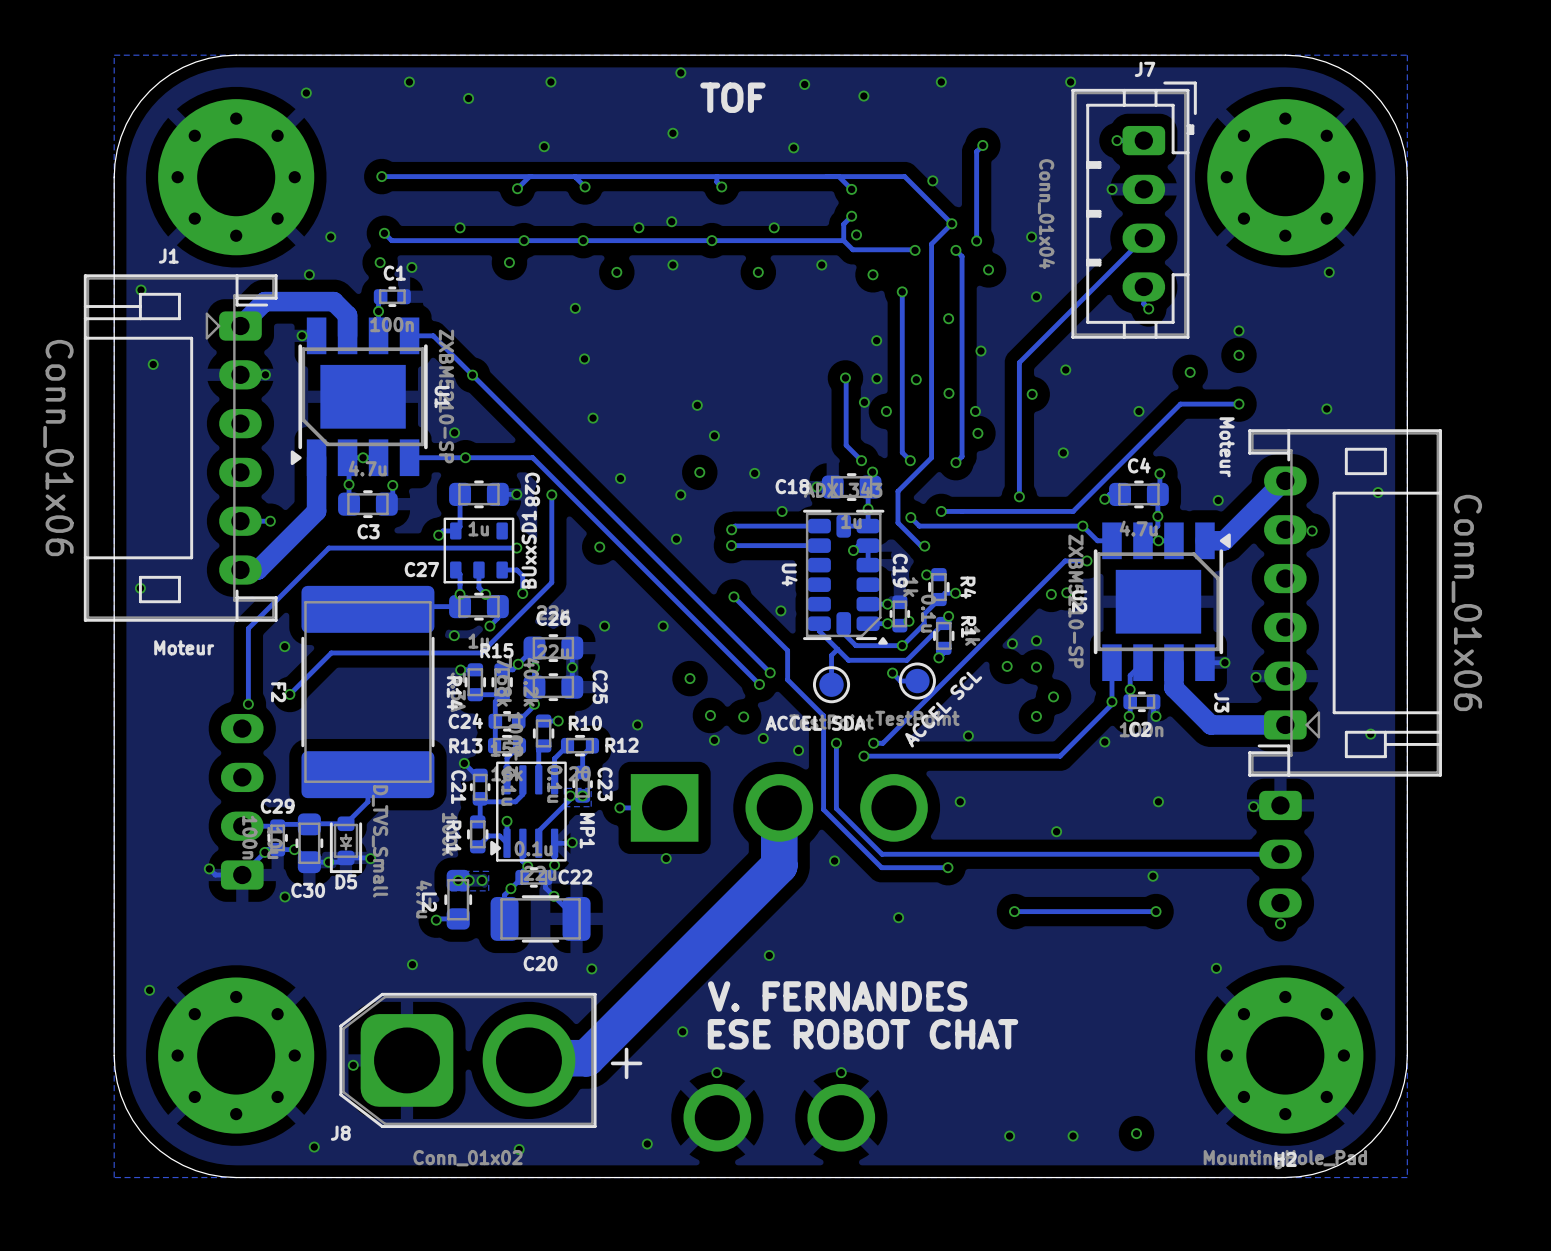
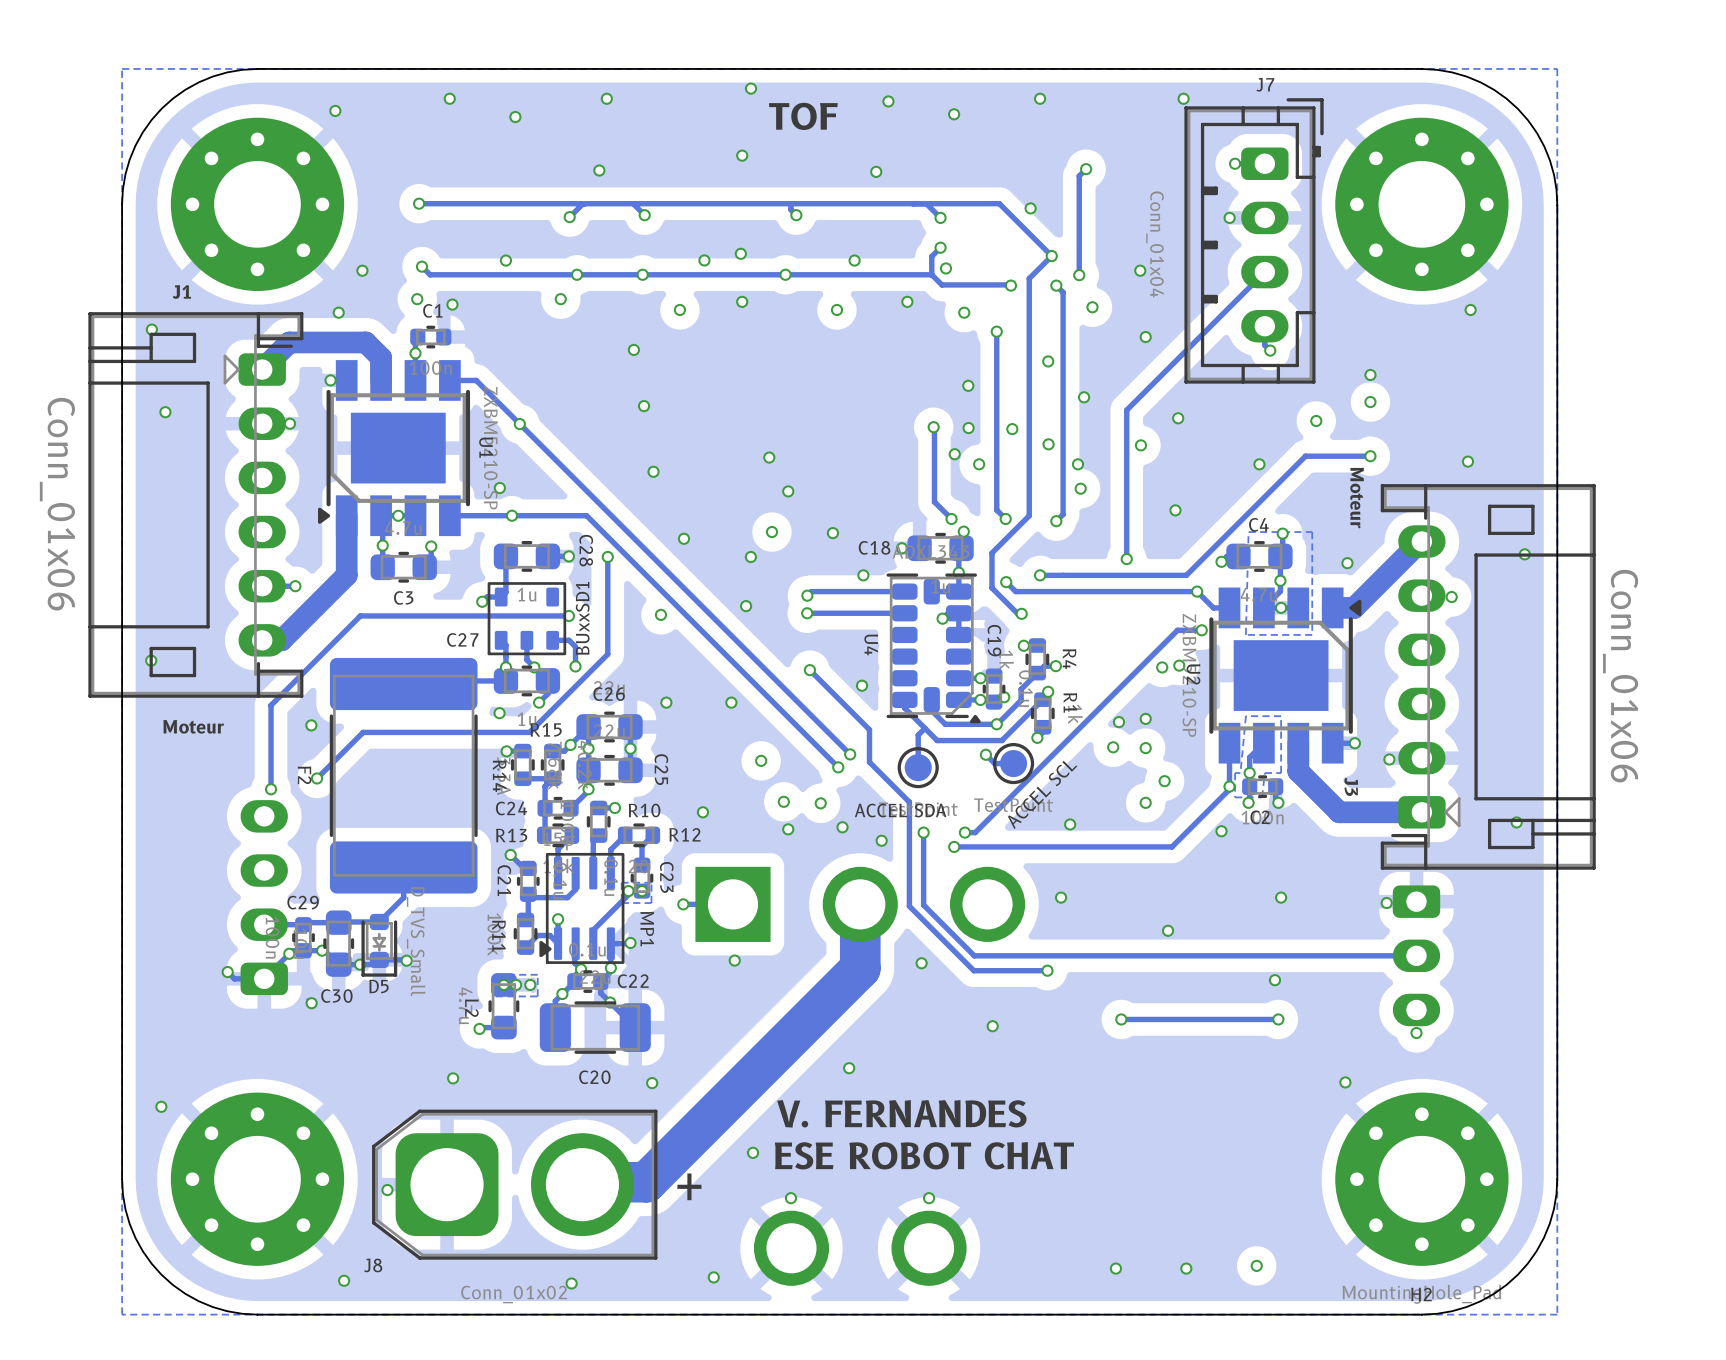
zone outline: none -> (1312, 532) (1312, 634) (1245, 634) (1248, 532) (1312, 532)
zone outline: none -> (1281, 716) (1281, 773) (1264, 773) (1262, 797) (1235, 797) (1235, 773) (1240, 773) (1245, 716) (1281, 716)

